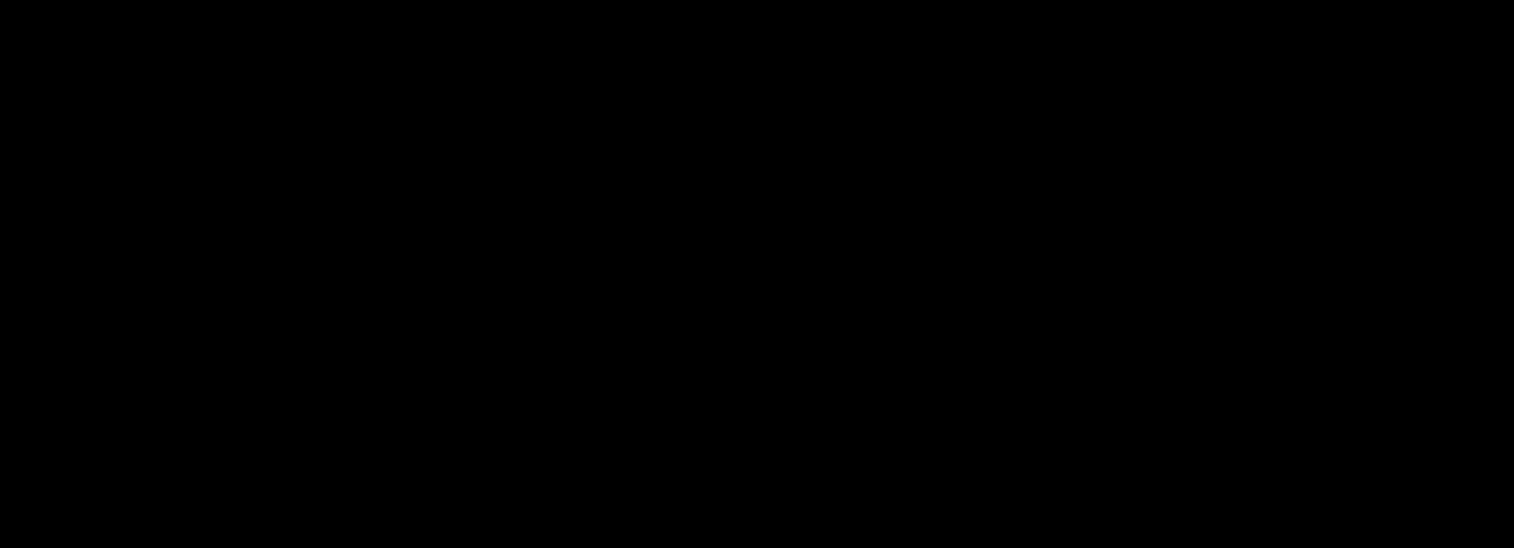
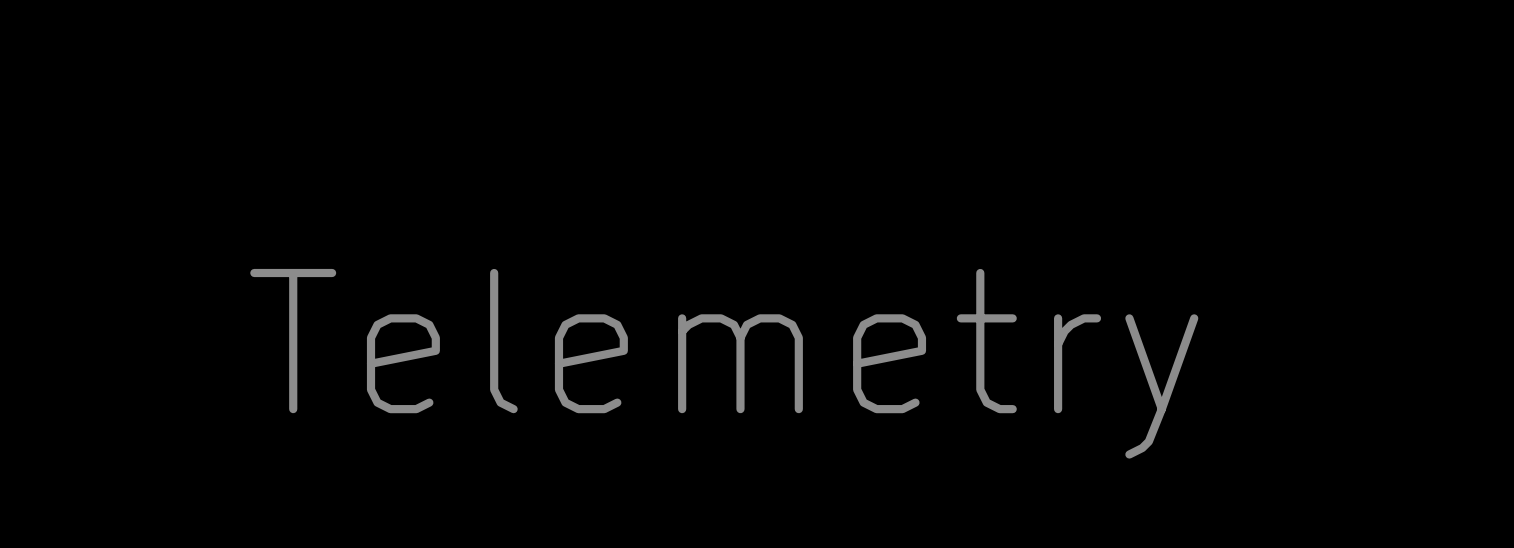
text: none -> Telemetry (724, 363)

